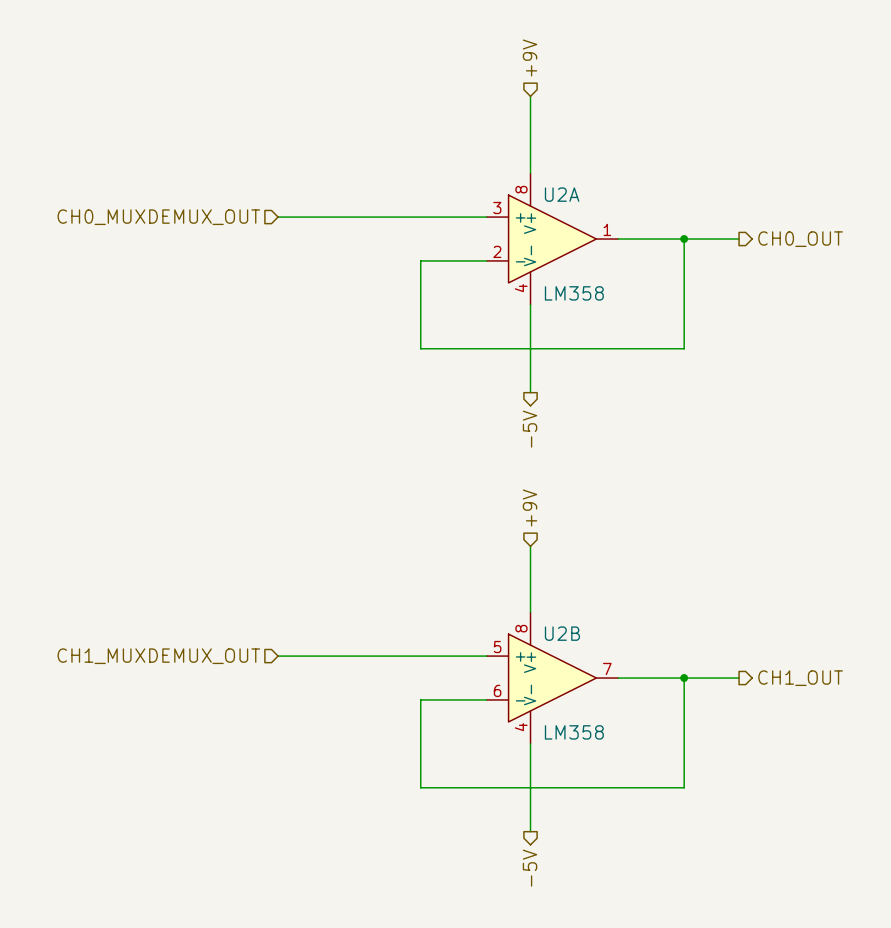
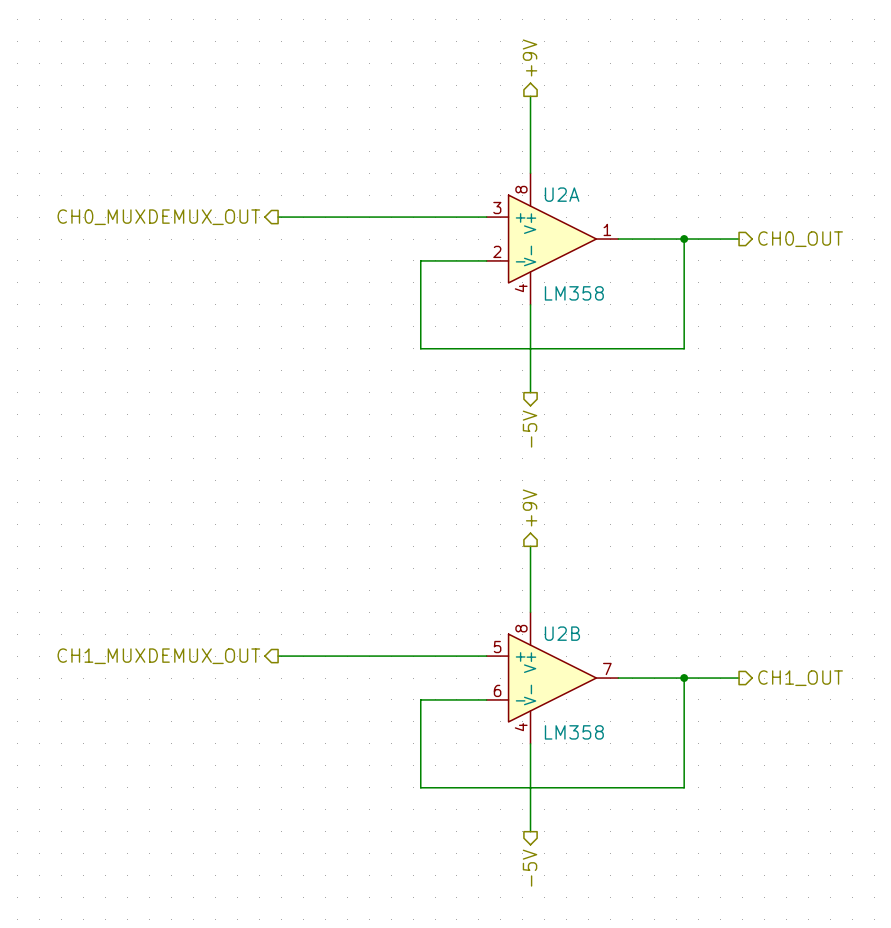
hierarchical label shape: input (530, 57) -> output (530, 57)
hierarchical label shape: input (158, 217) -> output (158, 217)
hierarchical label shape: input (530, 507) -> output (530, 507)
hierarchical label shape: input (158, 656) -> output (158, 656)

